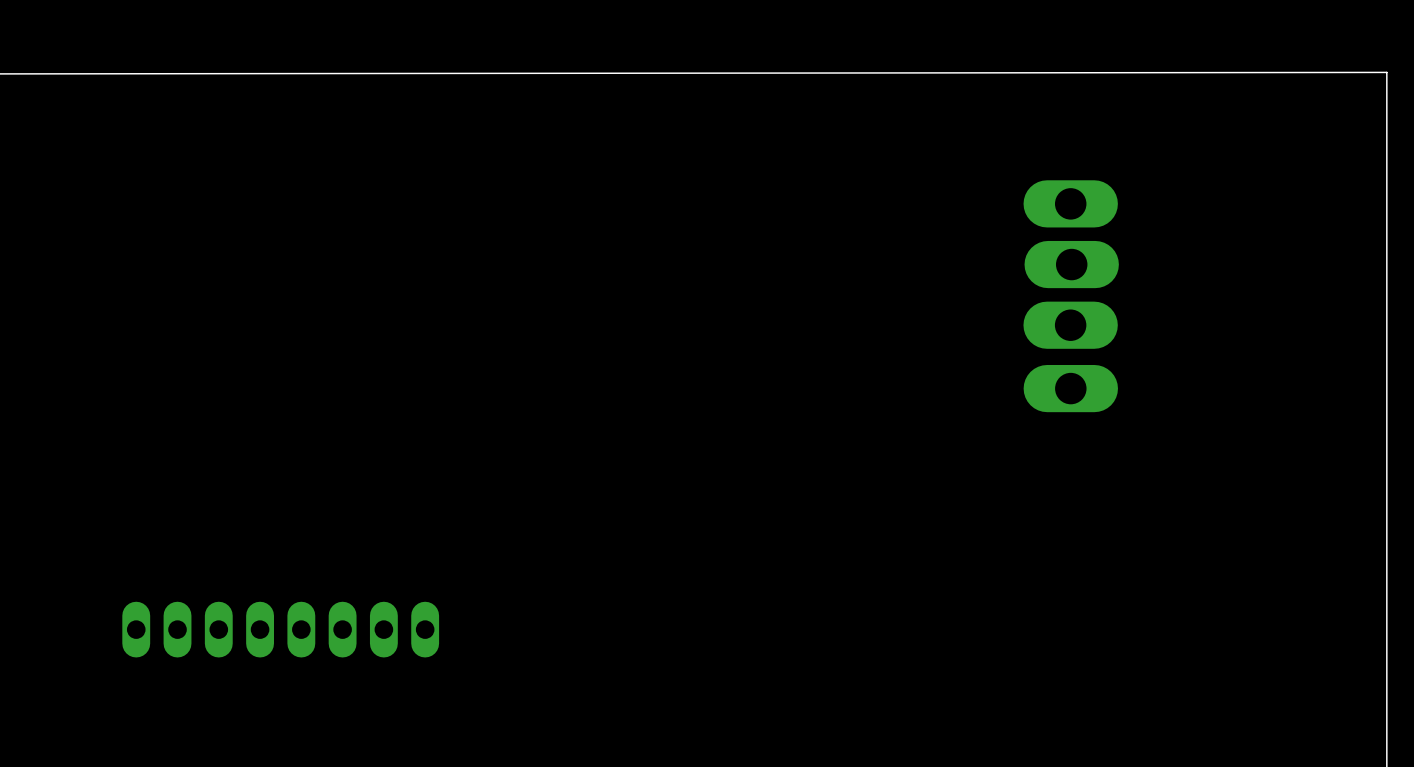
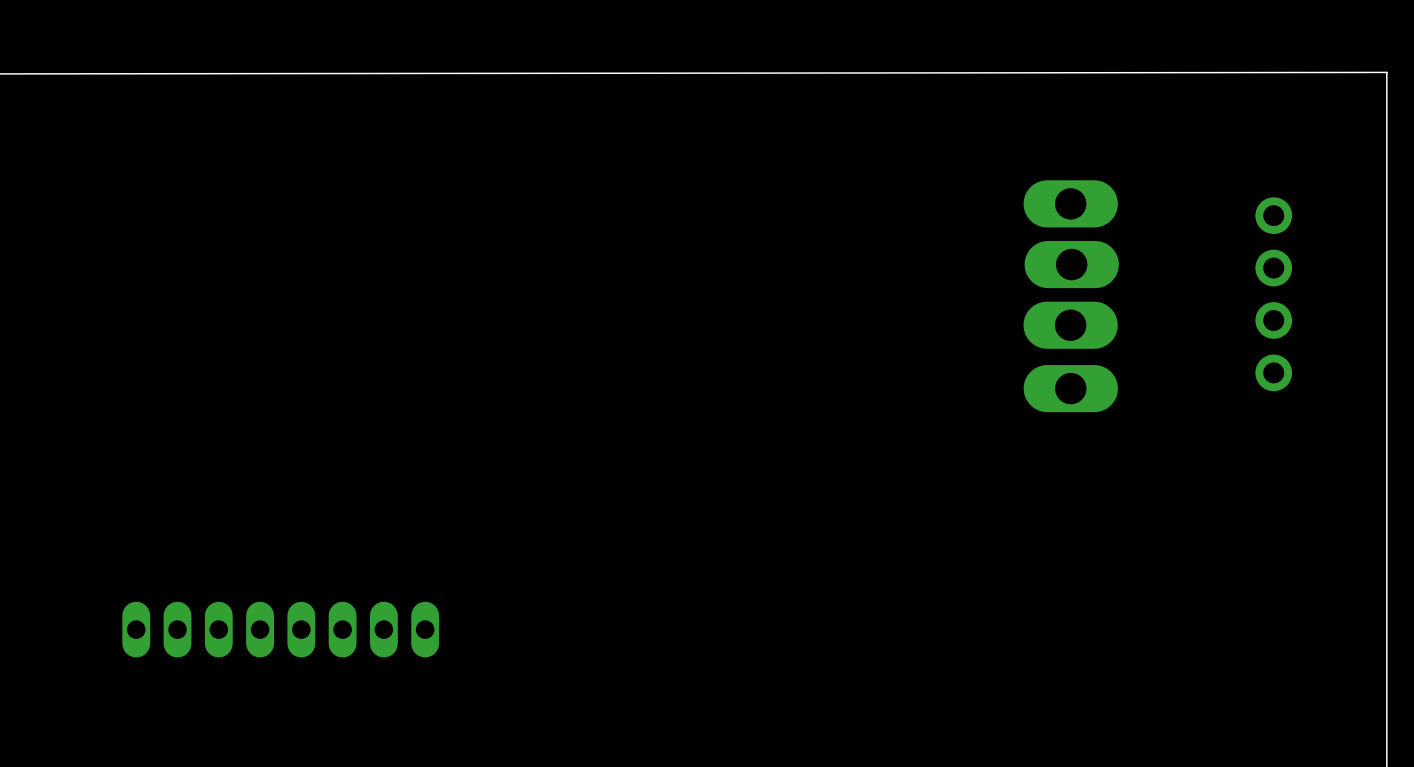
part: none -> (1273, 294)

